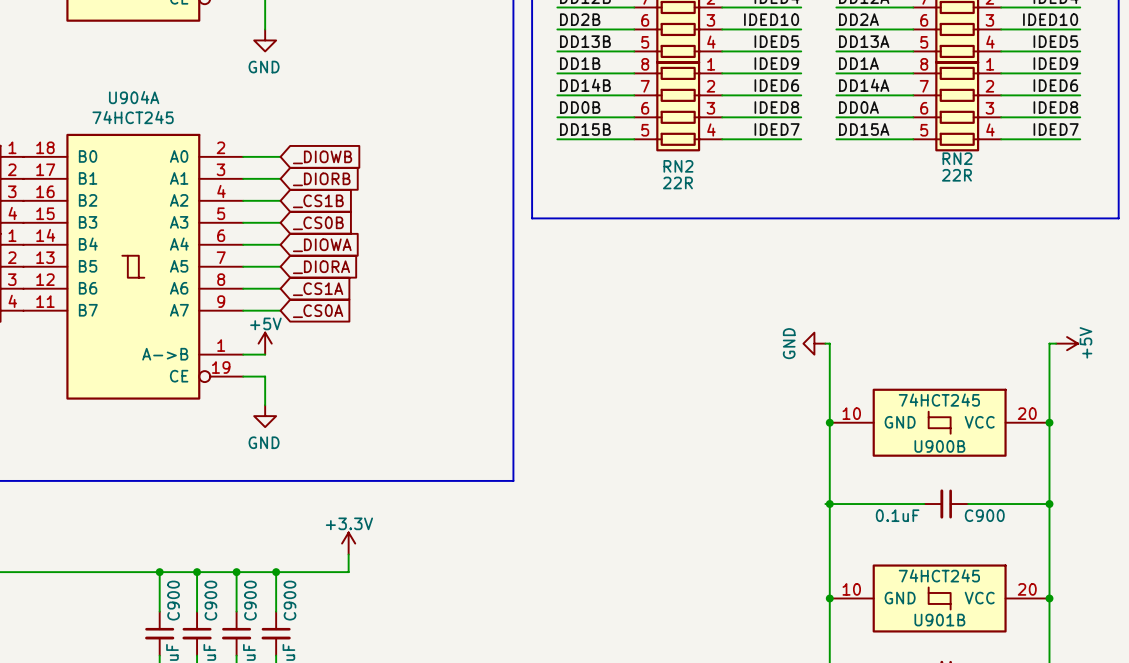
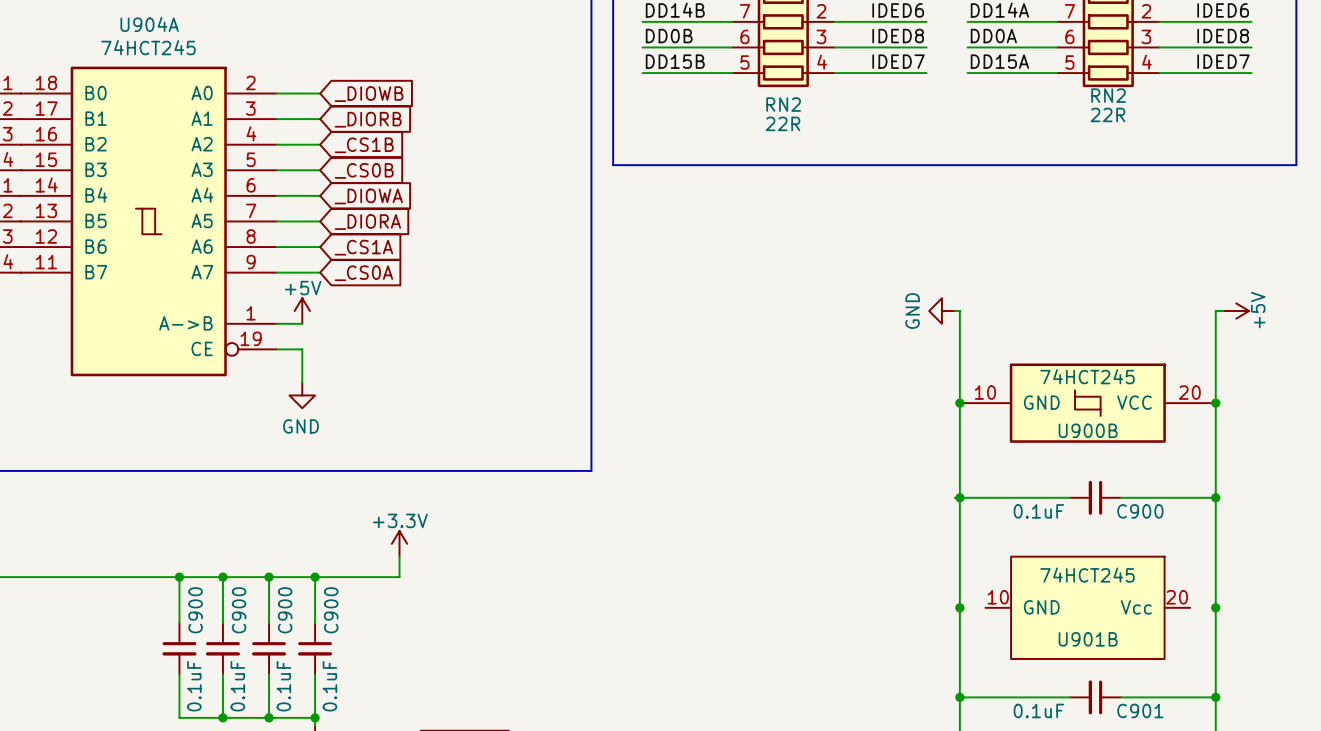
U901B symbol: [829, 564, 1050, 633] -> [985, 556, 1191, 660]

